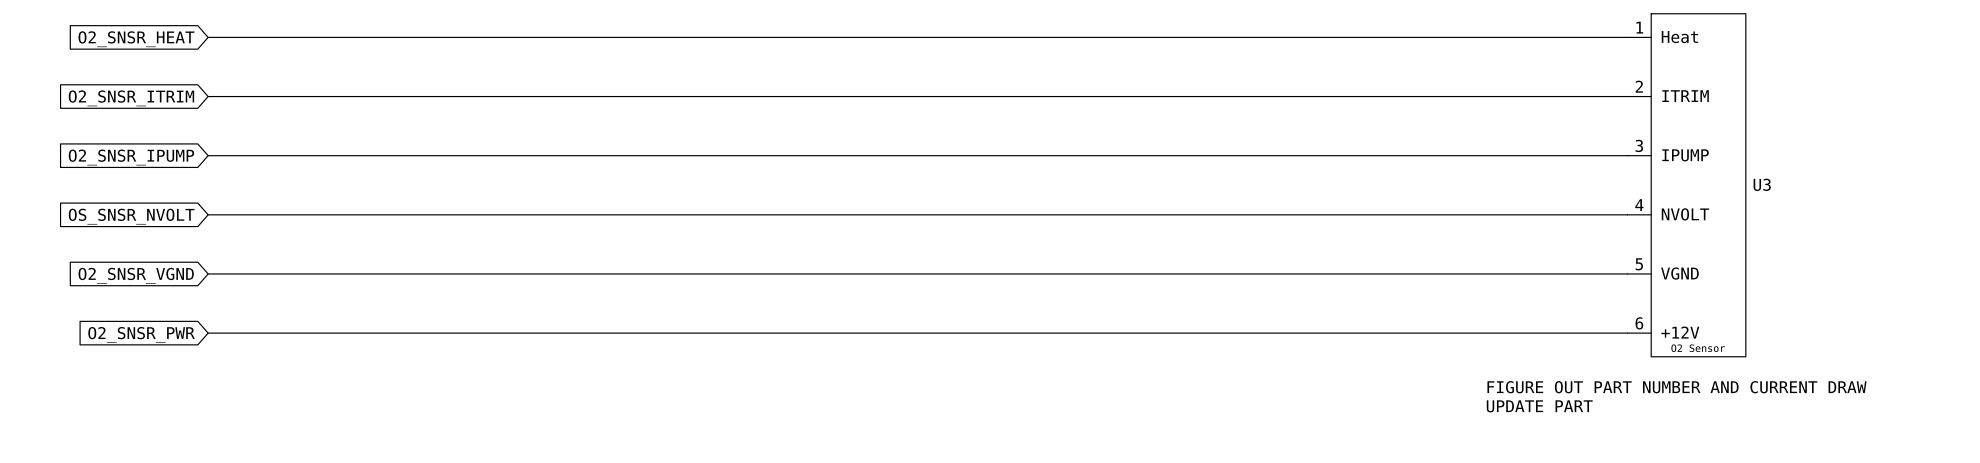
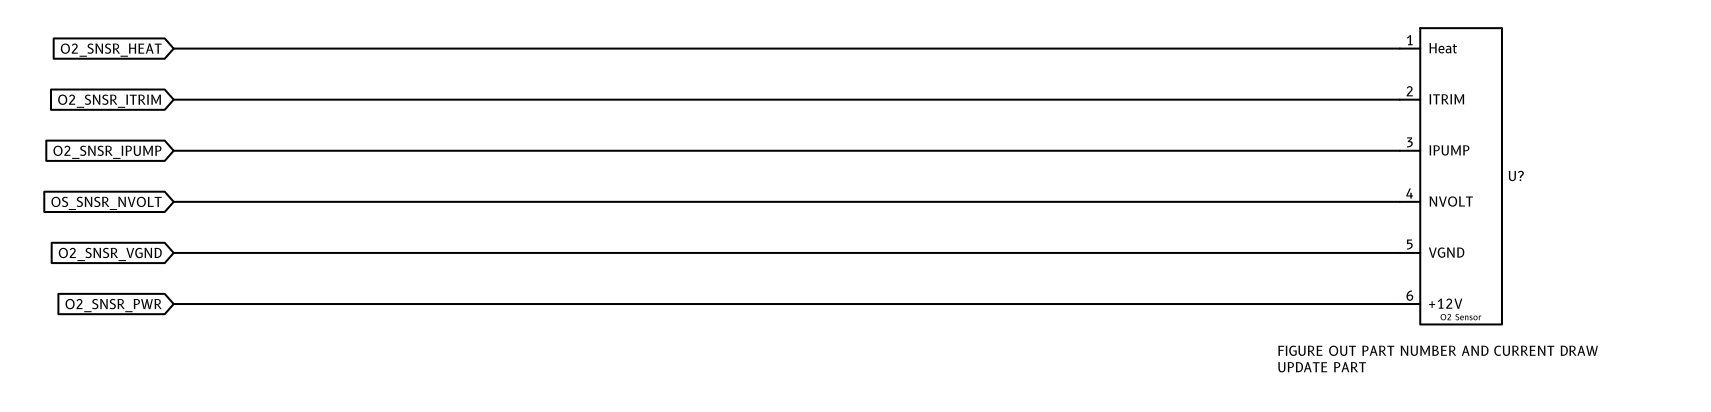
U3 name: U3 (1762, 184) -> U? (1516, 175)

